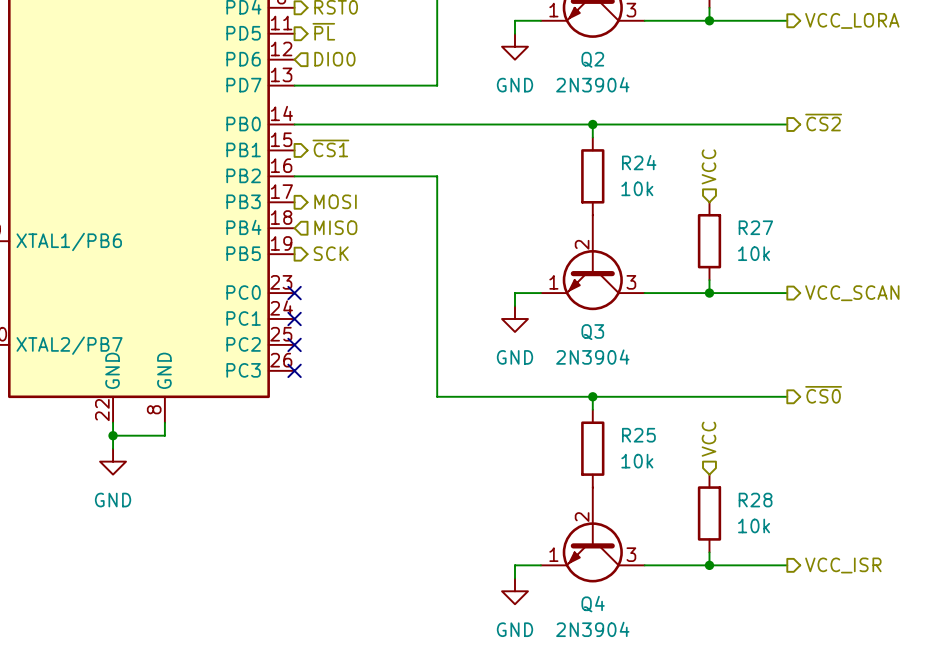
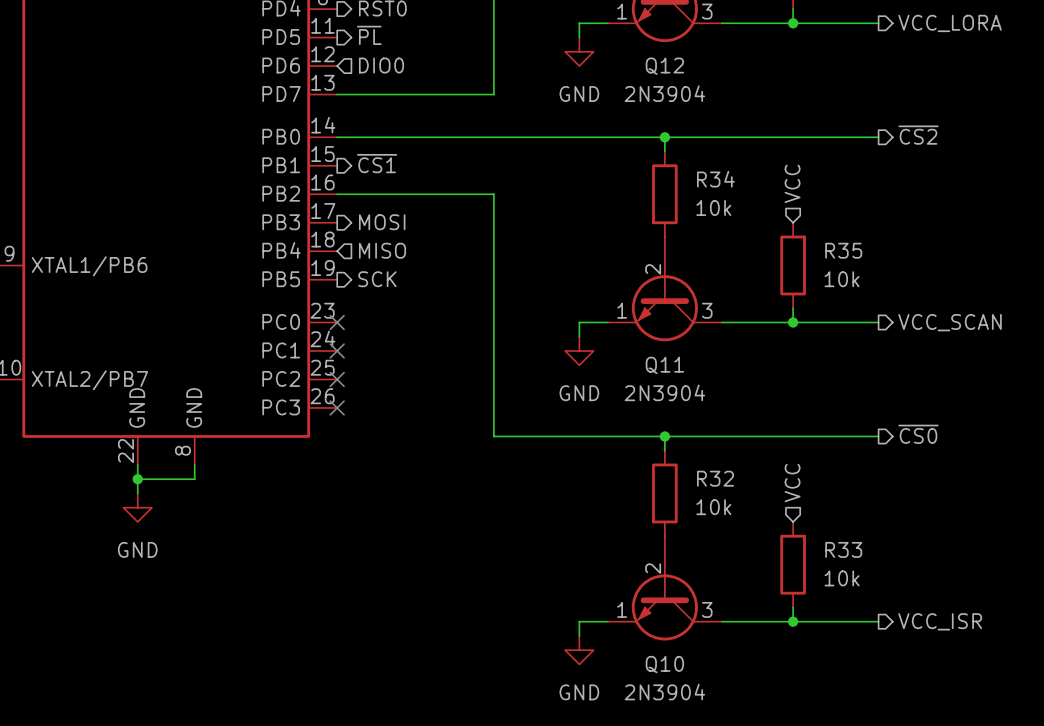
Q2 name: Q2 (592, 59) -> Q12 (664, 66)
R24 name: R24 (639, 162) -> R34 (715, 179)
R27 name: R27 (755, 227) -> R35 (843, 250)
Q3 name: Q3 (592, 332) -> Q11 (664, 365)
R25 name: R25 (638, 435) -> R32 (715, 478)
R28 name: R28 (755, 500) -> R33 (843, 549)
Q4 name: Q4 (593, 604) -> Q10 (664, 664)

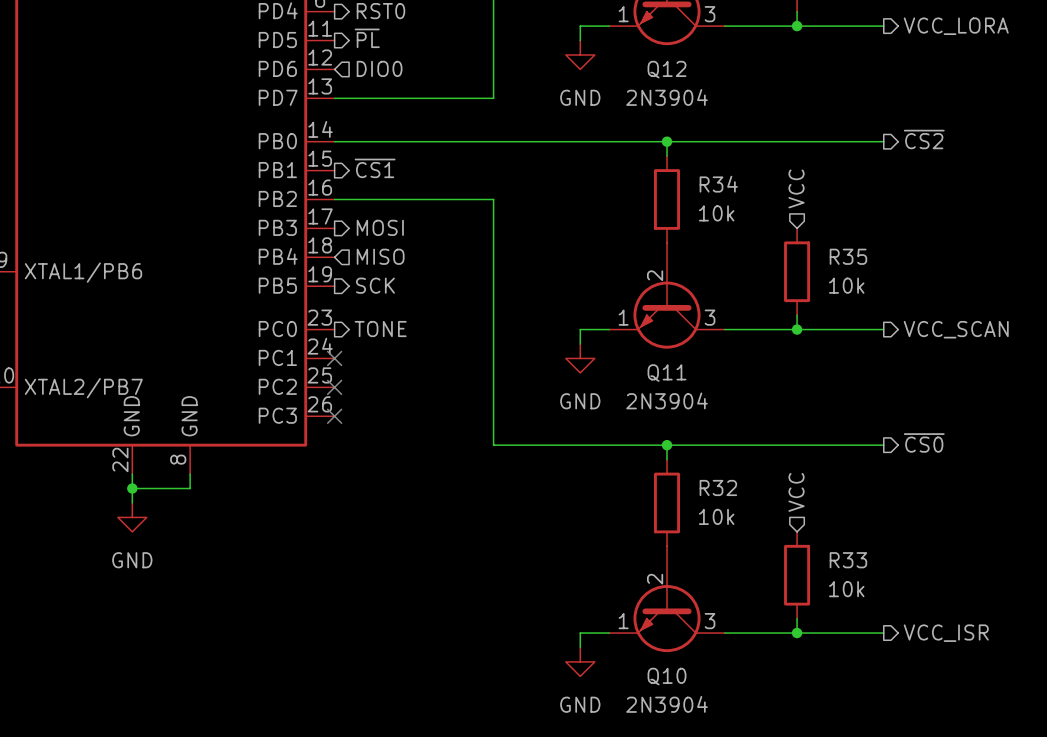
hierarchical label: none -> TONE (380, 329)
no-connect mark: (337, 322) -> none

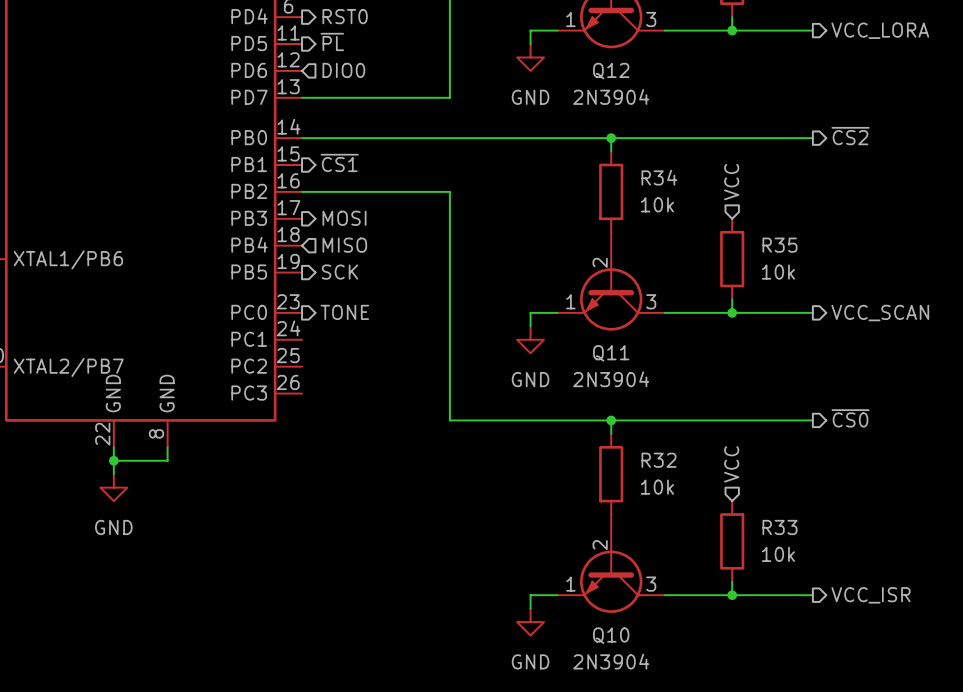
no-connect mark: (334, 358) -> none
no-connect mark: (334, 387) -> none
no-connect mark: (334, 416) -> none

